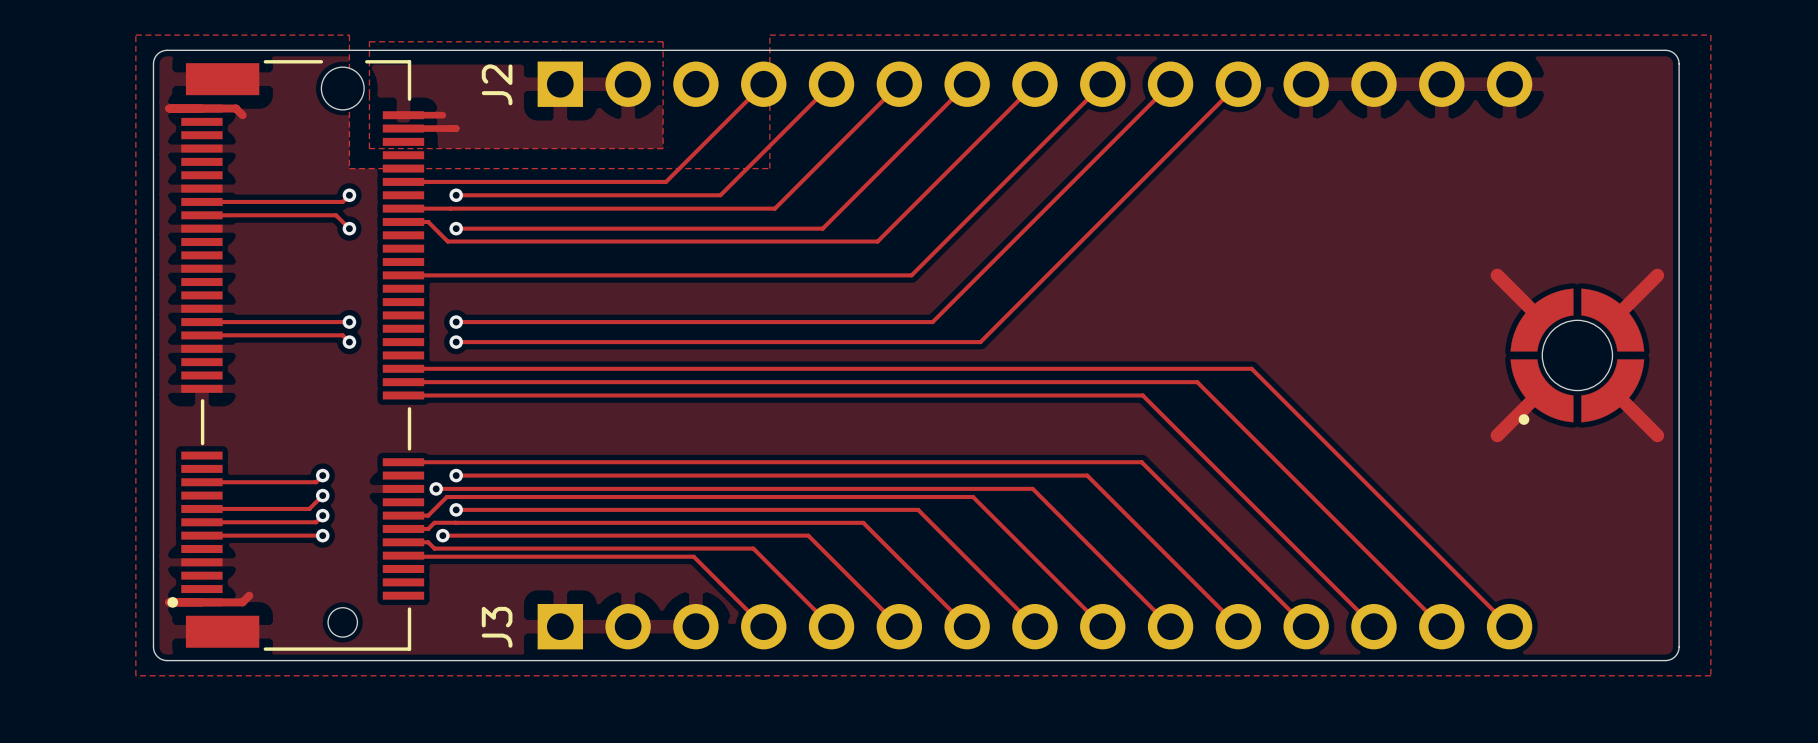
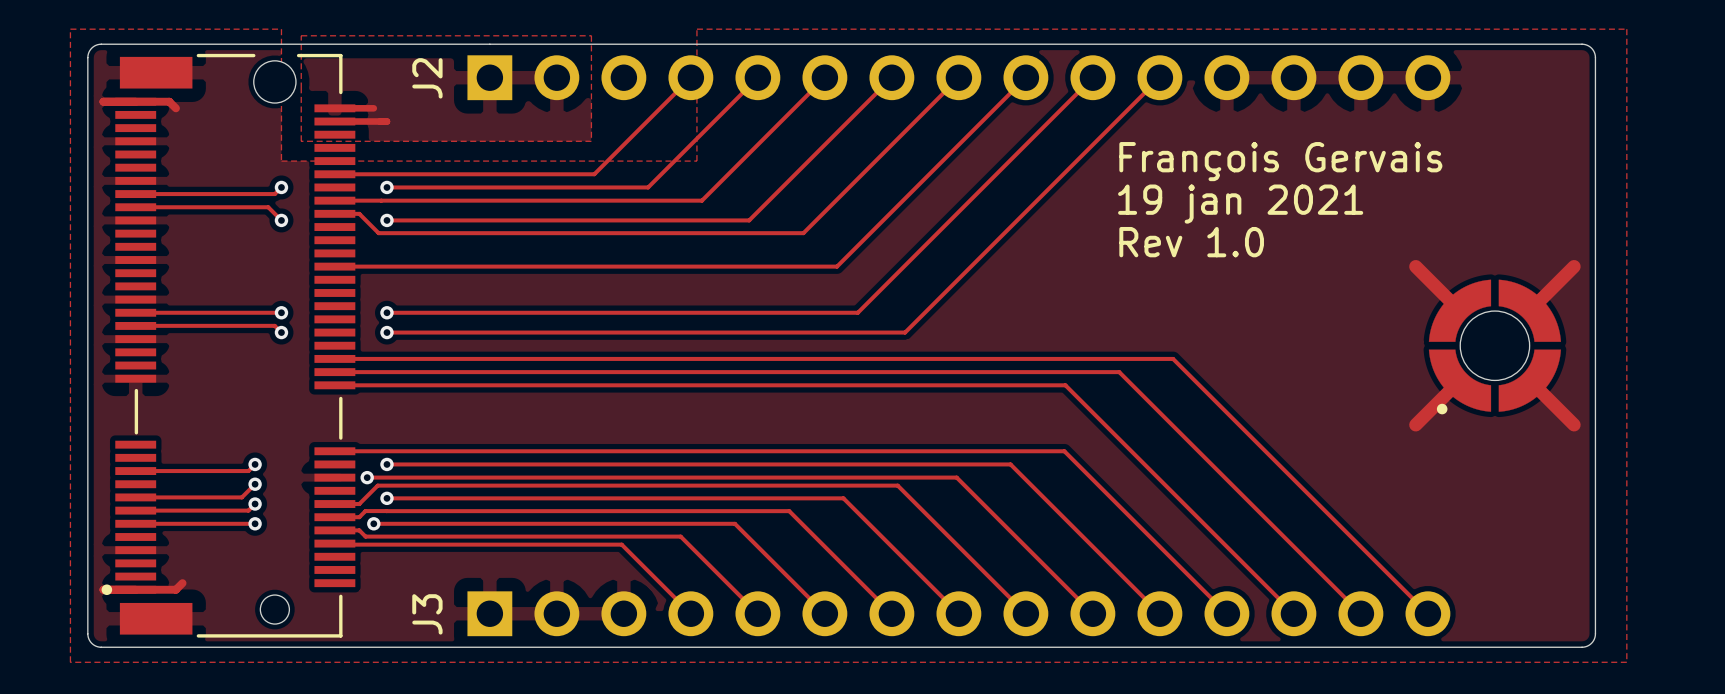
text: none -> François Gervais (1280, 161)
text: none -> 19 jan 2021 (1240, 204)
text: none -> Rev 1.0 (1191, 242)

